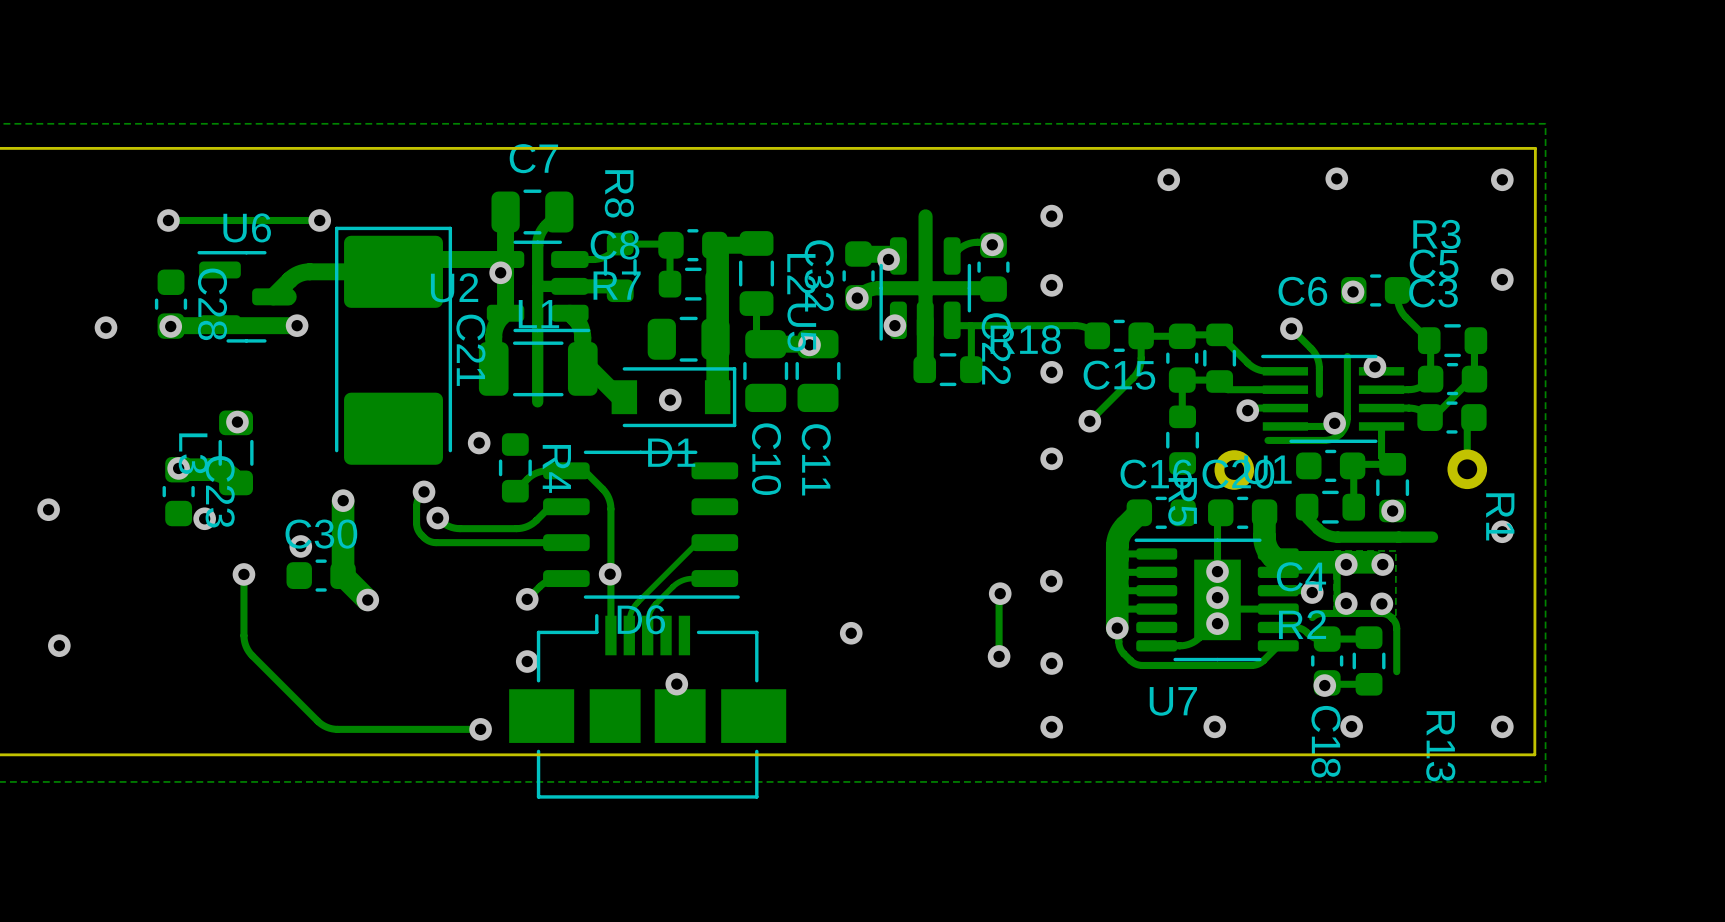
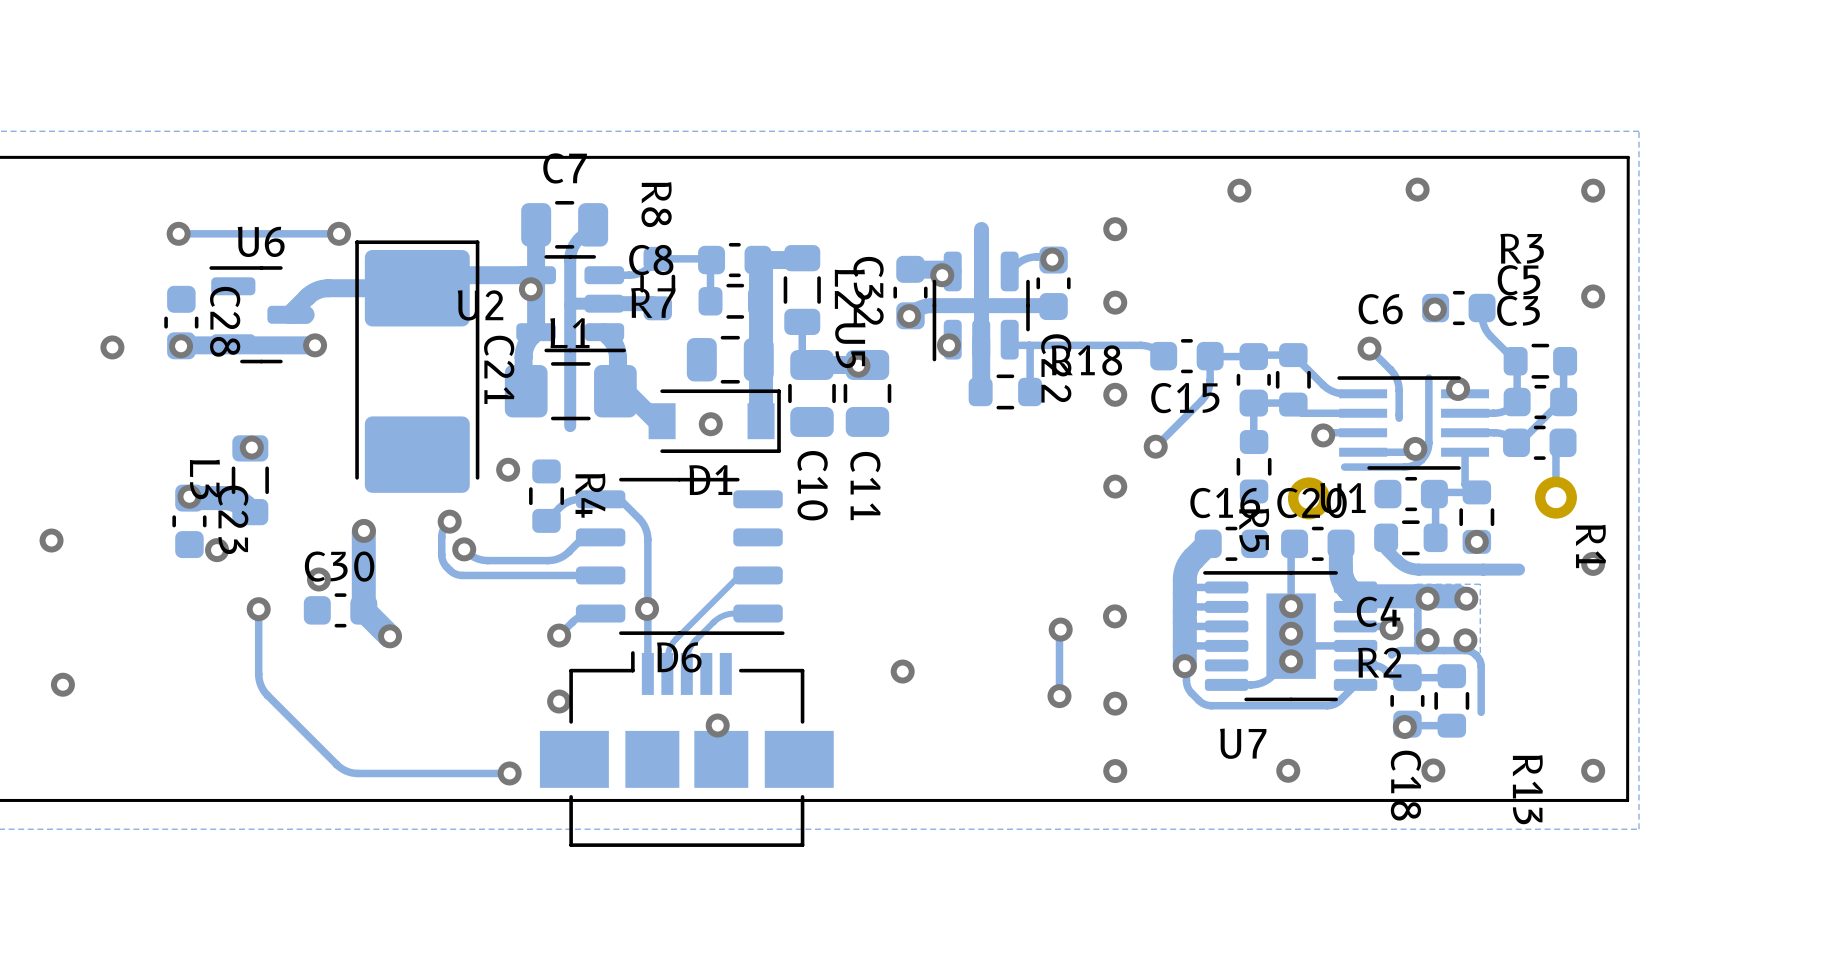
L1 footprint: [478, 341, 598, 397] -> [504, 362, 637, 421]

